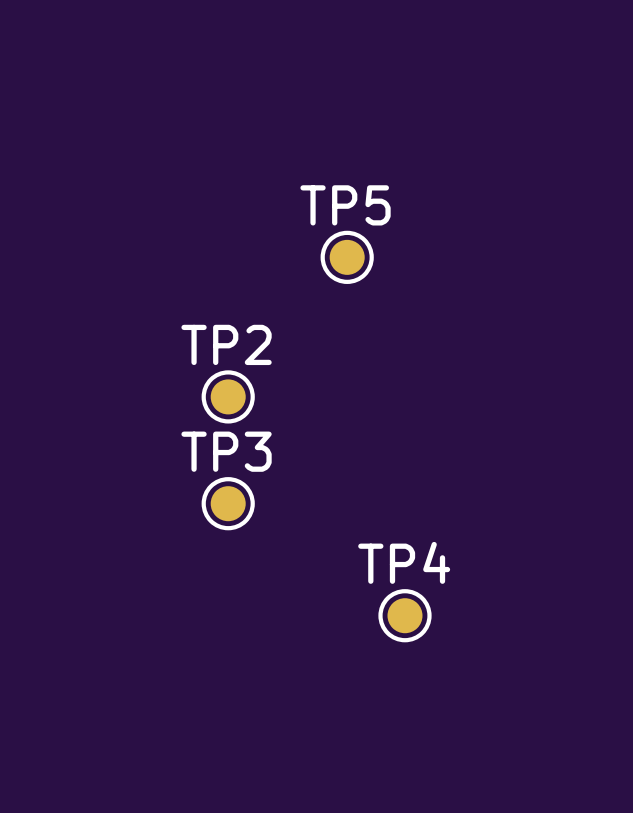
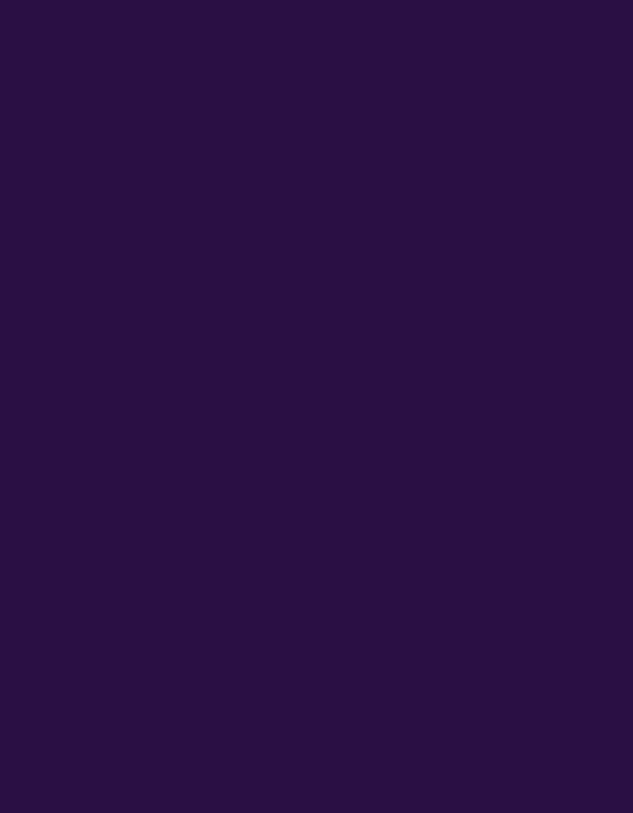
TP5: (347, 257) -> none
TP2: (228, 396) -> none
TP3: (228, 503) -> none
TP4: (405, 615) -> none

